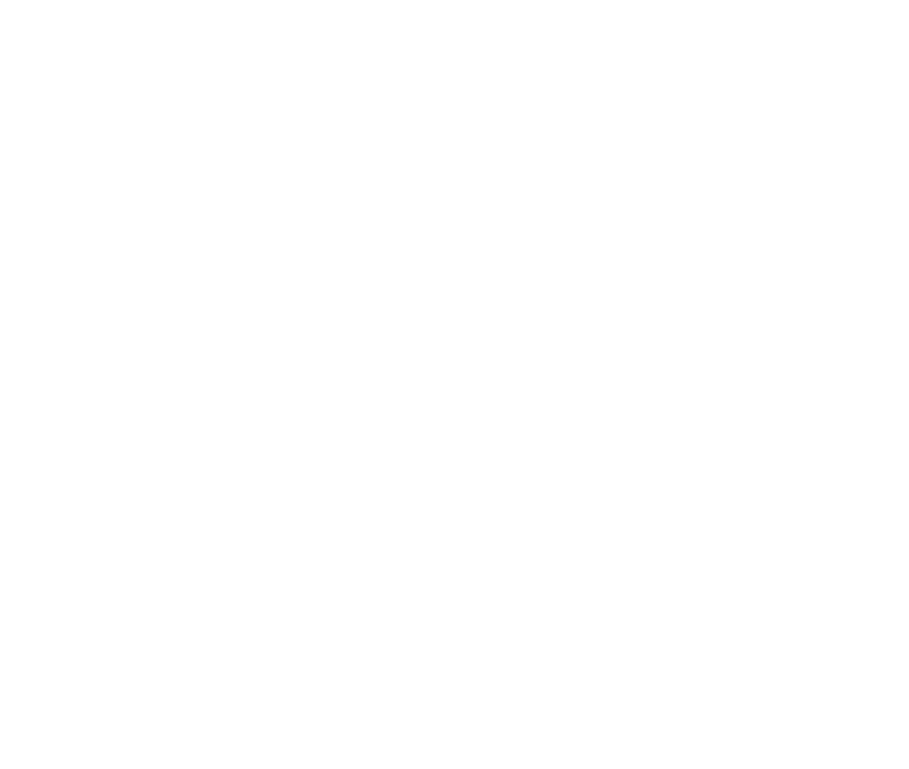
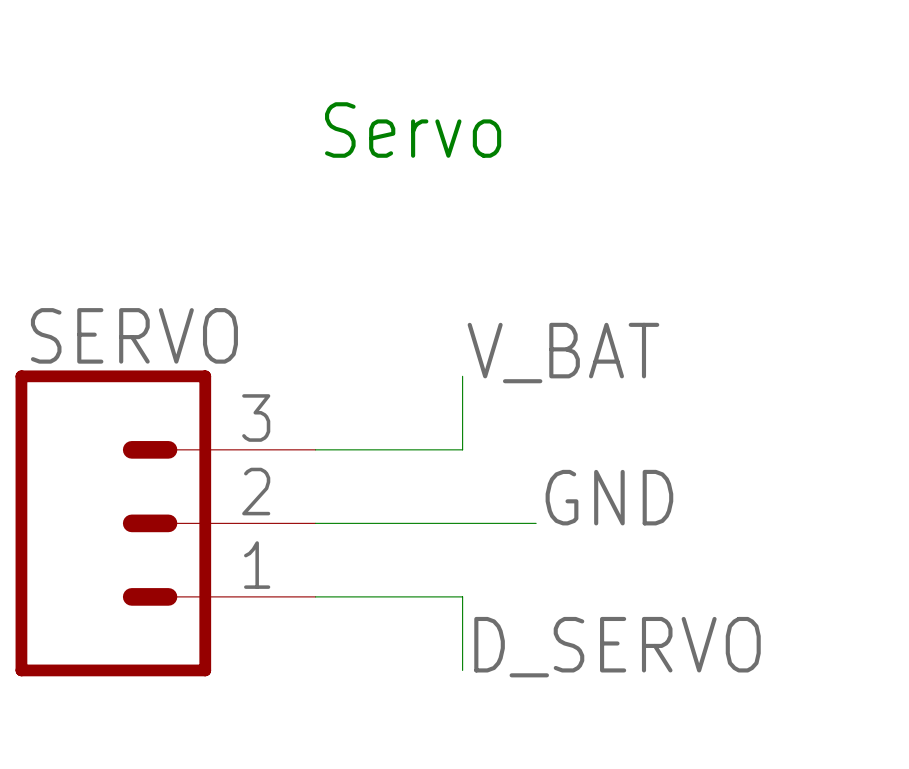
text: none -> Servo (413, 130)
label: none -> V_BAT (563, 353)
wire: none -> (462, 376) (462, 449) (315, 449)
label: none -> GND (609, 497)
SERVO: none -> (165, 523)
wire: none -> (315, 523) (536, 523)
wire: none -> (315, 596) (462, 596) (462, 670)
label: none -> D_SERVO (617, 647)

